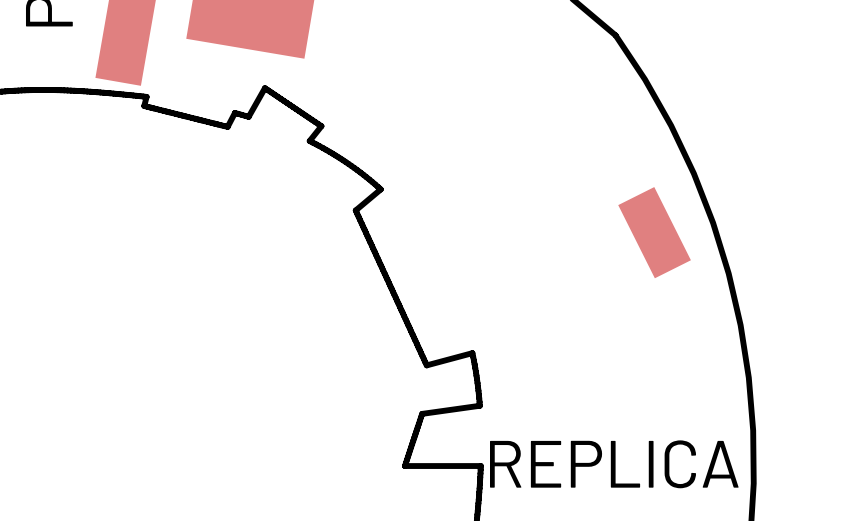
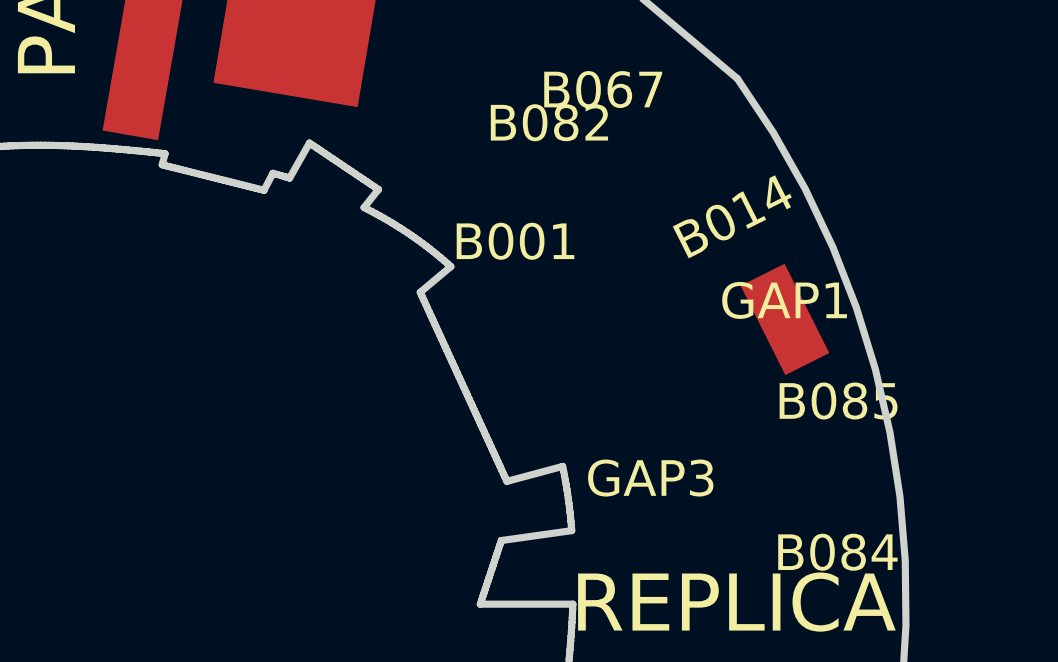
B067: none -> (603, 89)
B082: none -> (549, 122)
B014 name: none -> B014 (732, 216)
B001: none -> (515, 241)
GAP1: none -> (784, 300)
B085: none -> (838, 401)
GAP3: none -> (650, 478)
B084: none -> (837, 552)

